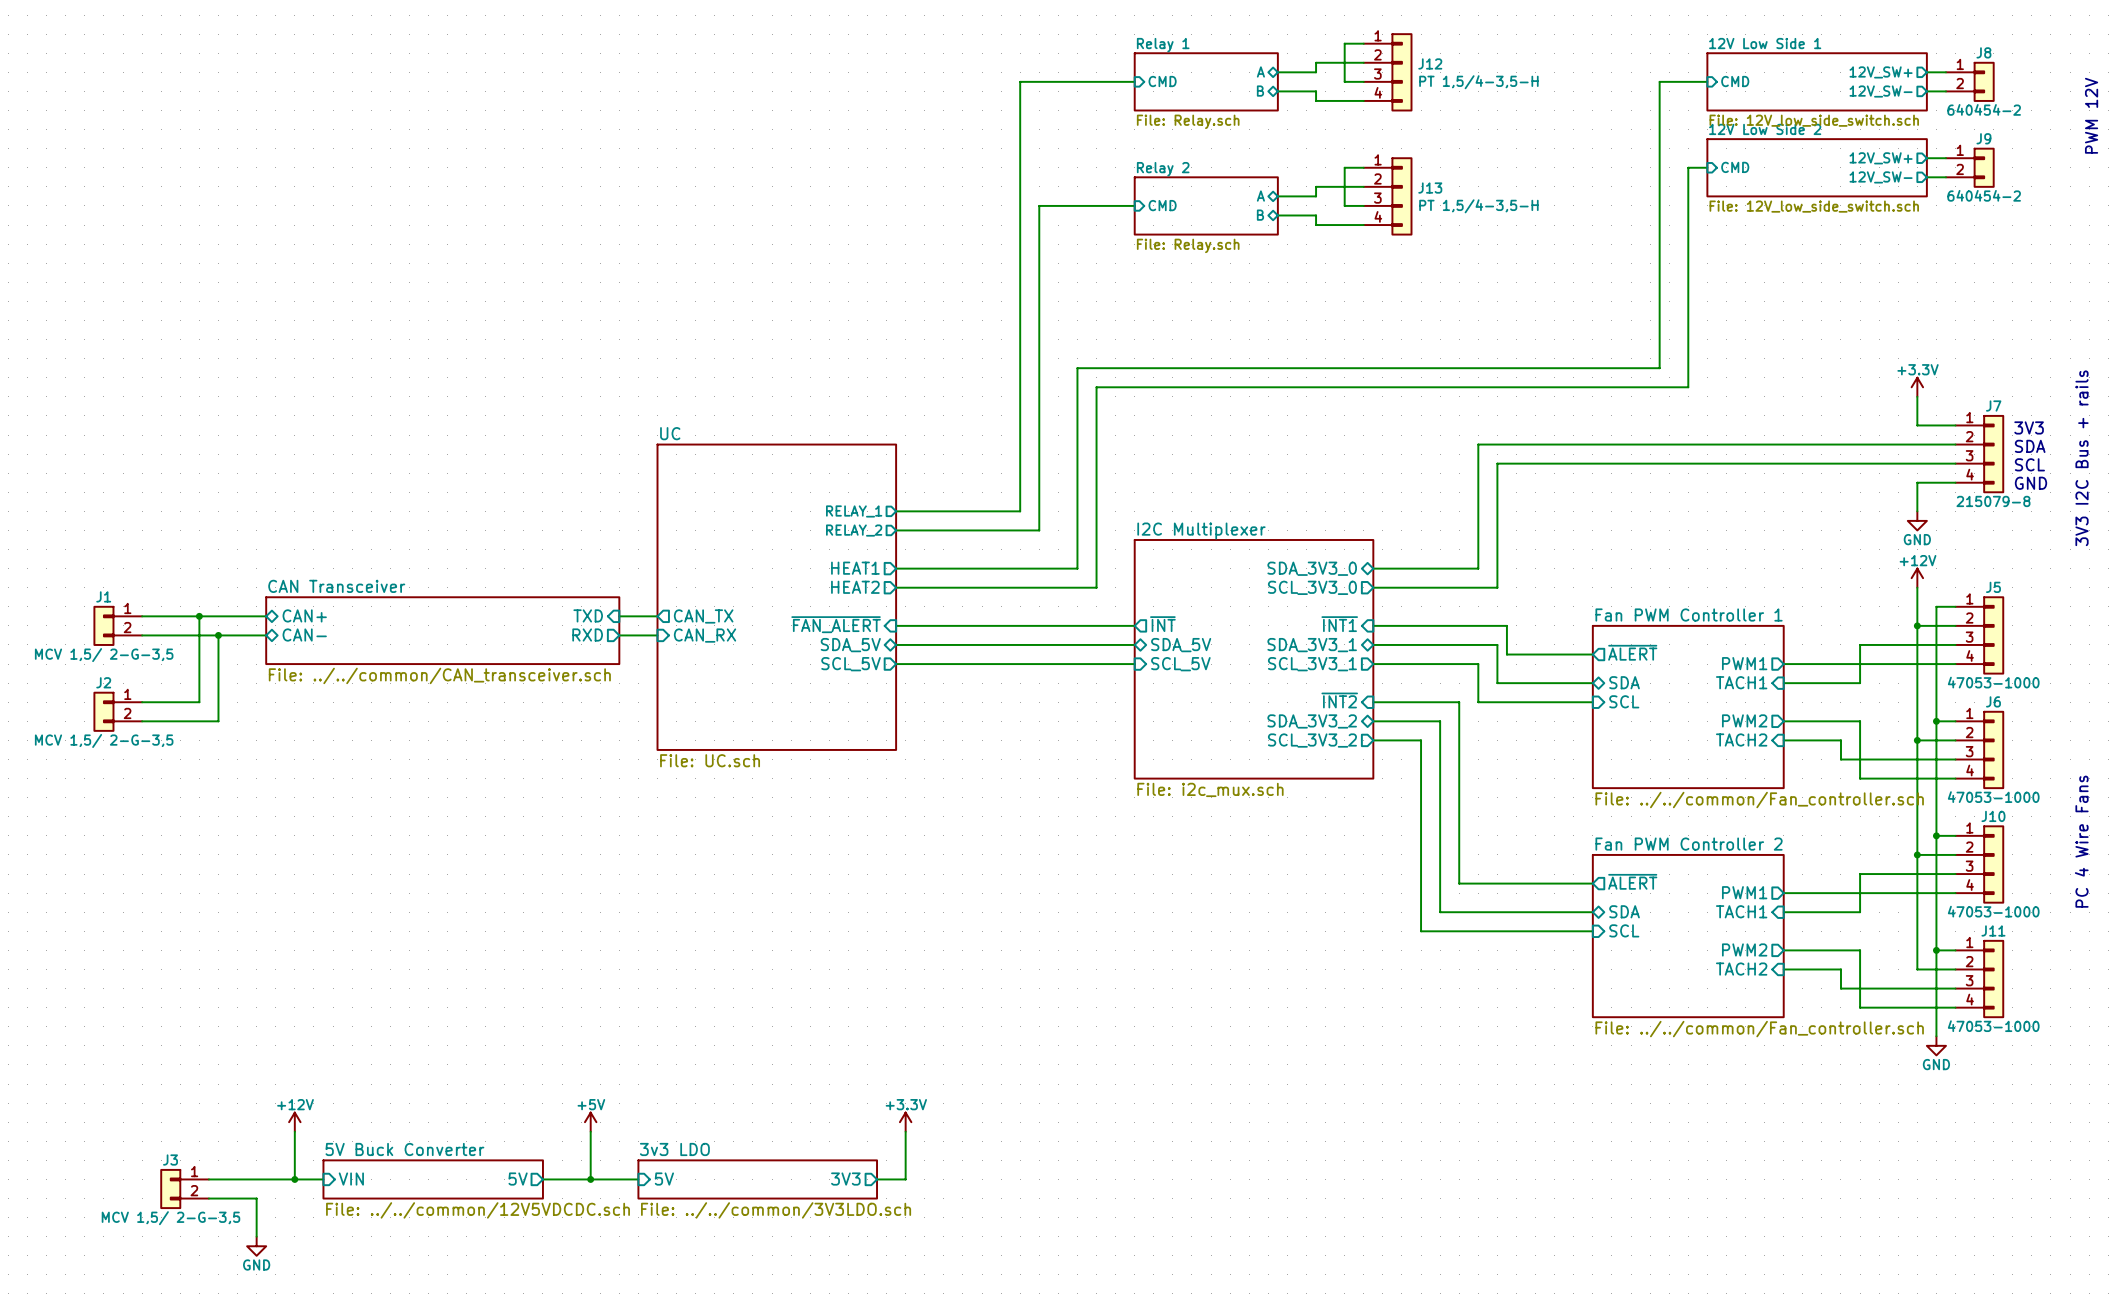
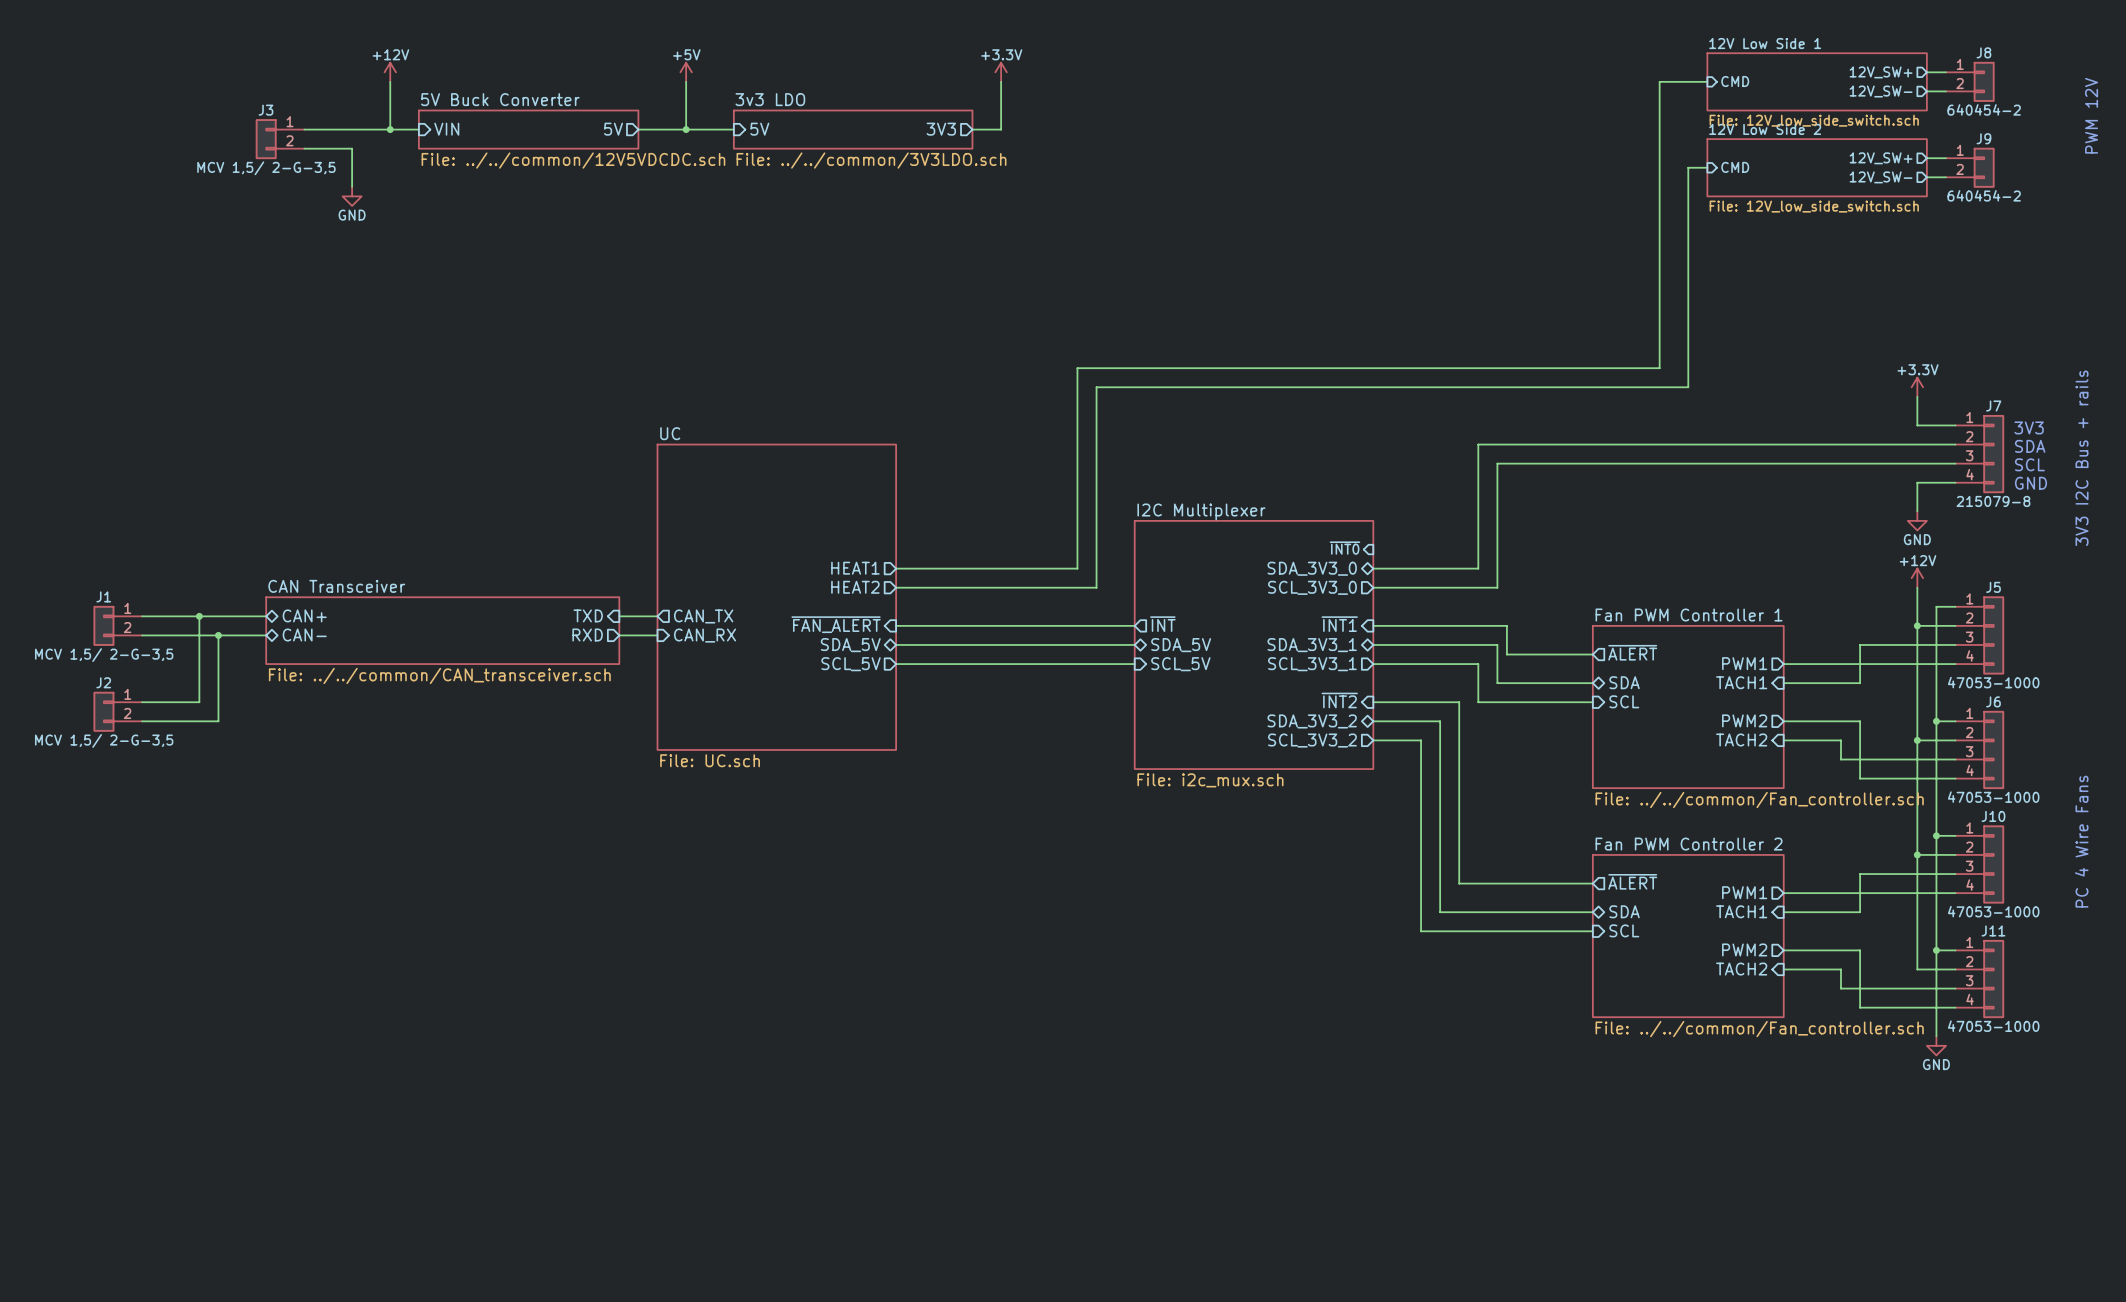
wire: (1363, 43) (1344, 43) (1344, 81) (1363, 81) -> none
wire: (1363, 62) (1316, 62) (1316, 72) (1277, 72) -> none
sheet pin: A (1260, 71) -> none
power symbol: none -> +12V (390, 72)
power symbol: none -> +5V (686, 72)
power symbol: none -> +3.3V (1001, 72)
J12: PT 1,5/4-3,5-H (1388, 72) -> none
wire: none -> (390, 81) (390, 129)
wire: none -> (686, 81) (686, 129)
wire: none -> (1001, 81) (1001, 129) (972, 129)
wire: (1134, 81) (1020, 81) (1020, 511) (896, 511) -> none
sheet pin: CMD (1162, 81) -> none
sheet Relay 1: File: Relay.sch (1206, 81) -> none
sheet pin: B (1260, 91) -> none
wire: (1277, 91) (1316, 91) (1316, 100) (1363, 100) -> none
wire: none -> (304, 129) (418, 129)
junction: none -> (390, 129)
sheet pin: none -> VIN (446, 129)
sheet pin: none -> 5V (613, 129)
wire: none -> (638, 129) (733, 129)
junction: none -> (686, 129)
sheet pin: none -> 5V (759, 129)
sheet pin: none -> 3V3 (941, 129)
wire: none -> (304, 148) (352, 148) (352, 186)
wire: (1363, 167) (1344, 167) (1344, 205) (1363, 205) -> none
wire: (1363, 186) (1316, 186) (1316, 196) (1277, 196) -> none
power symbol: none -> GND (352, 196)
sheet pin: A (1260, 196) -> none
J13: PT 1,5/4-3,5-H (1388, 196) -> none
wire: (1134, 205) (1039, 205) (1039, 530) (896, 530) -> none
sheet pin: CMD (1162, 205) -> none
sheet Relay 2: File: Relay.sch (1206, 205) -> none
sheet pin: B (1260, 215) -> none
wire: (1277, 215) (1316, 215) (1316, 225) (1363, 225) -> none
sheet pin: RELAY_1 (854, 511) -> none
sheet pin: RELAY_2 (854, 530) -> none
sheet I2C Multiplexer shape: [1134, 539, 1374, 779] -> [1134, 520, 1374, 770]
sheet pin: none -> ~{INT0} (1344, 548)
power symbol: +12V (294, 1122) -> none
power symbol: +5V (590, 1122) -> none
power symbol: +3.3V (905, 1122) -> none
wire: (294, 1131) (294, 1179) -> none
wire: (590, 1131) (590, 1179) -> none
wire: (905, 1131) (905, 1179) (877, 1179) -> none
wire: (208, 1179) (323, 1179) -> none
junction: (294, 1179) -> none
sheet pin: VIN (351, 1179) -> none
sheet 5V Buck Converter position: (433, 1179) -> (528, 129)
sheet pin: 5V (518, 1179) -> none
wire: (542, 1179) (638, 1179) -> none
junction: (590, 1179) -> none
sheet pin: 5V (664, 1179) -> none
sheet 3v3 LDO position: (757, 1179) -> (853, 129)
sheet pin: 3V3 (845, 1179) -> none
J3 position: (184, 1189) -> (280, 139)
wire: (208, 1198) (256, 1198) (256, 1236) -> none
power symbol: GND (256, 1246) -> none

